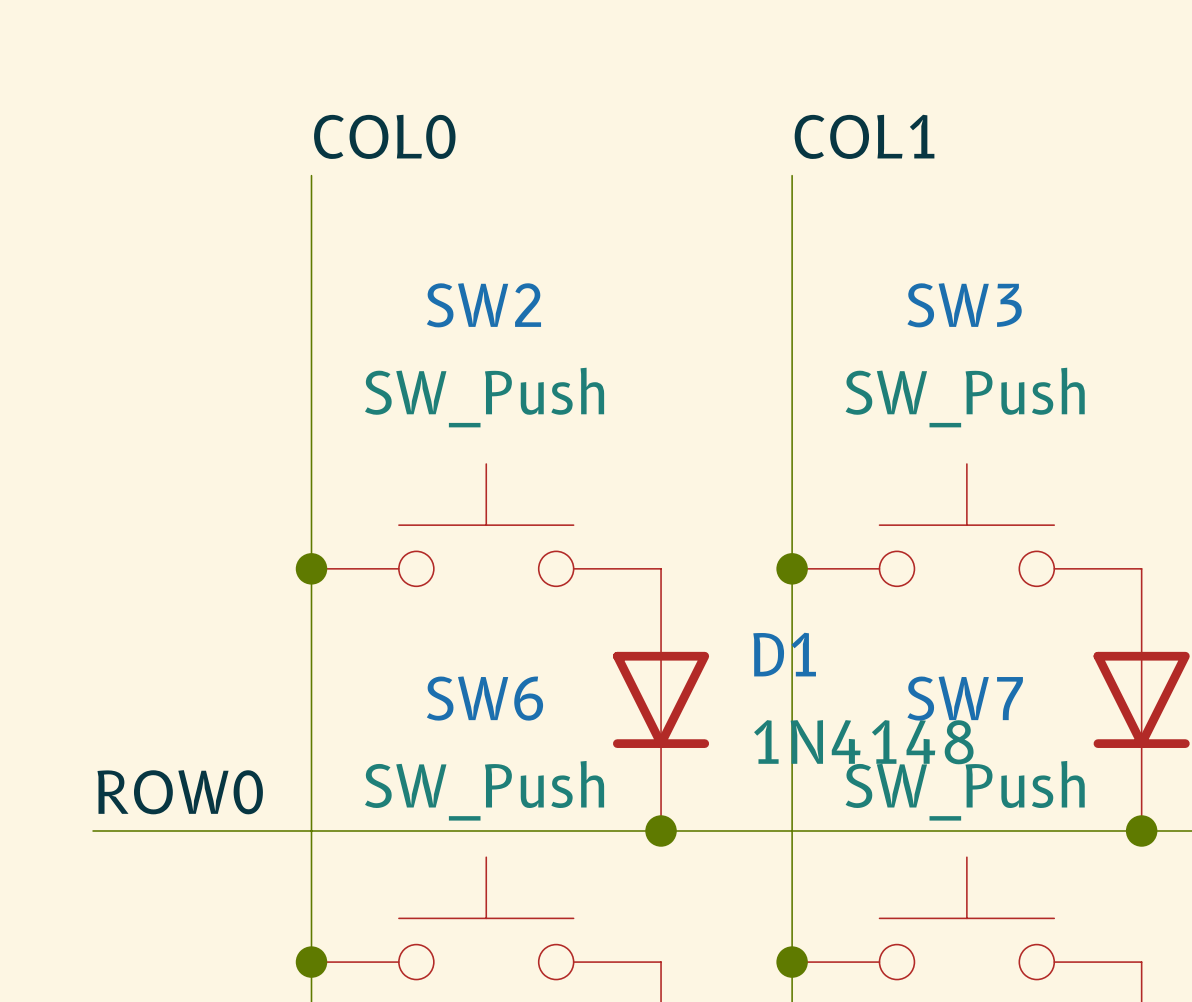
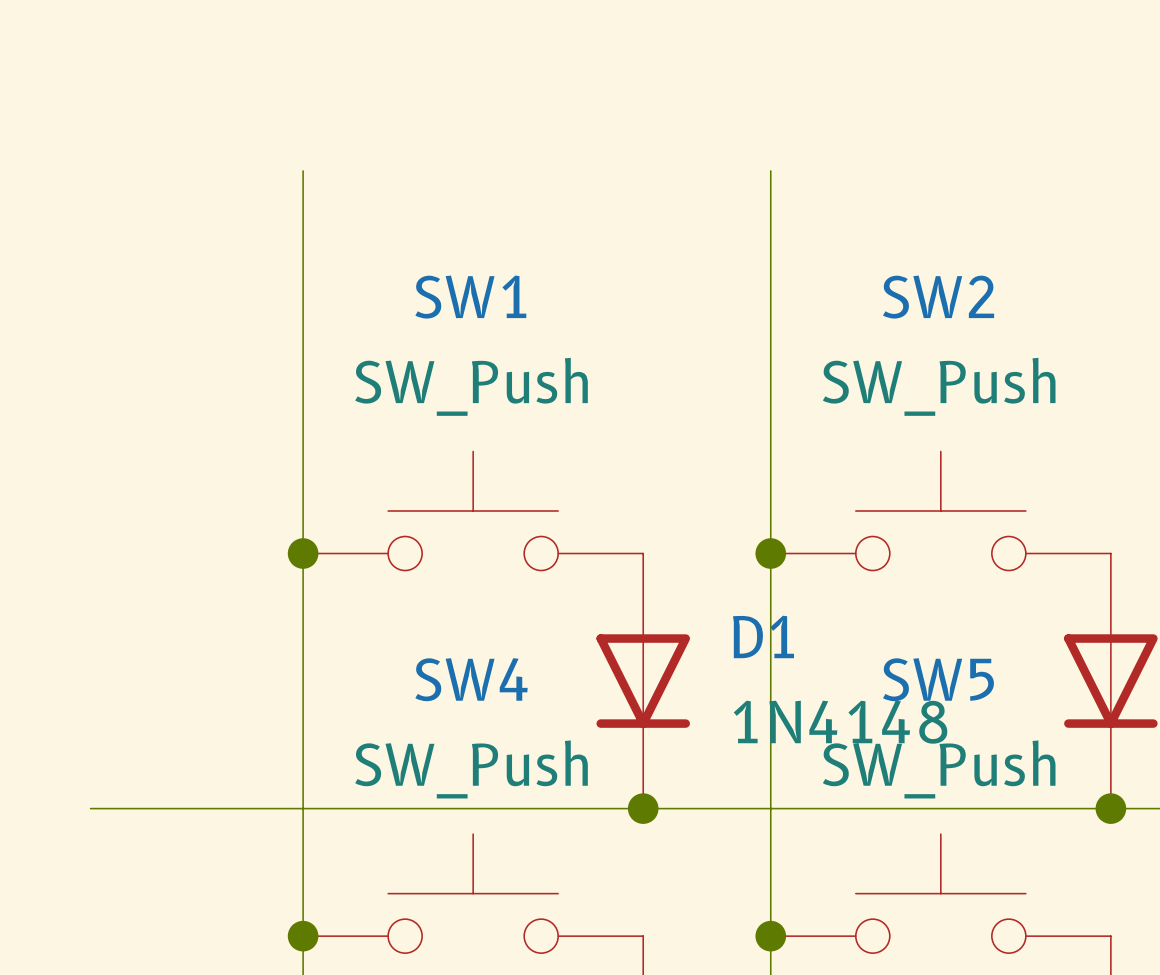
label: COL0 (384, 136) -> none
label: COL1 (864, 136) -> none
SW2 name: SW2 (483, 305) -> SW1 (470, 297)
SW3 name: SW3 (964, 305) -> SW2 (938, 297)
SW6 name: SW6 (484, 698) -> SW4 (471, 679)
SW7 name: SW7 (965, 698) -> SW5 (938, 679)
label: ROW0 (180, 792) -> none

